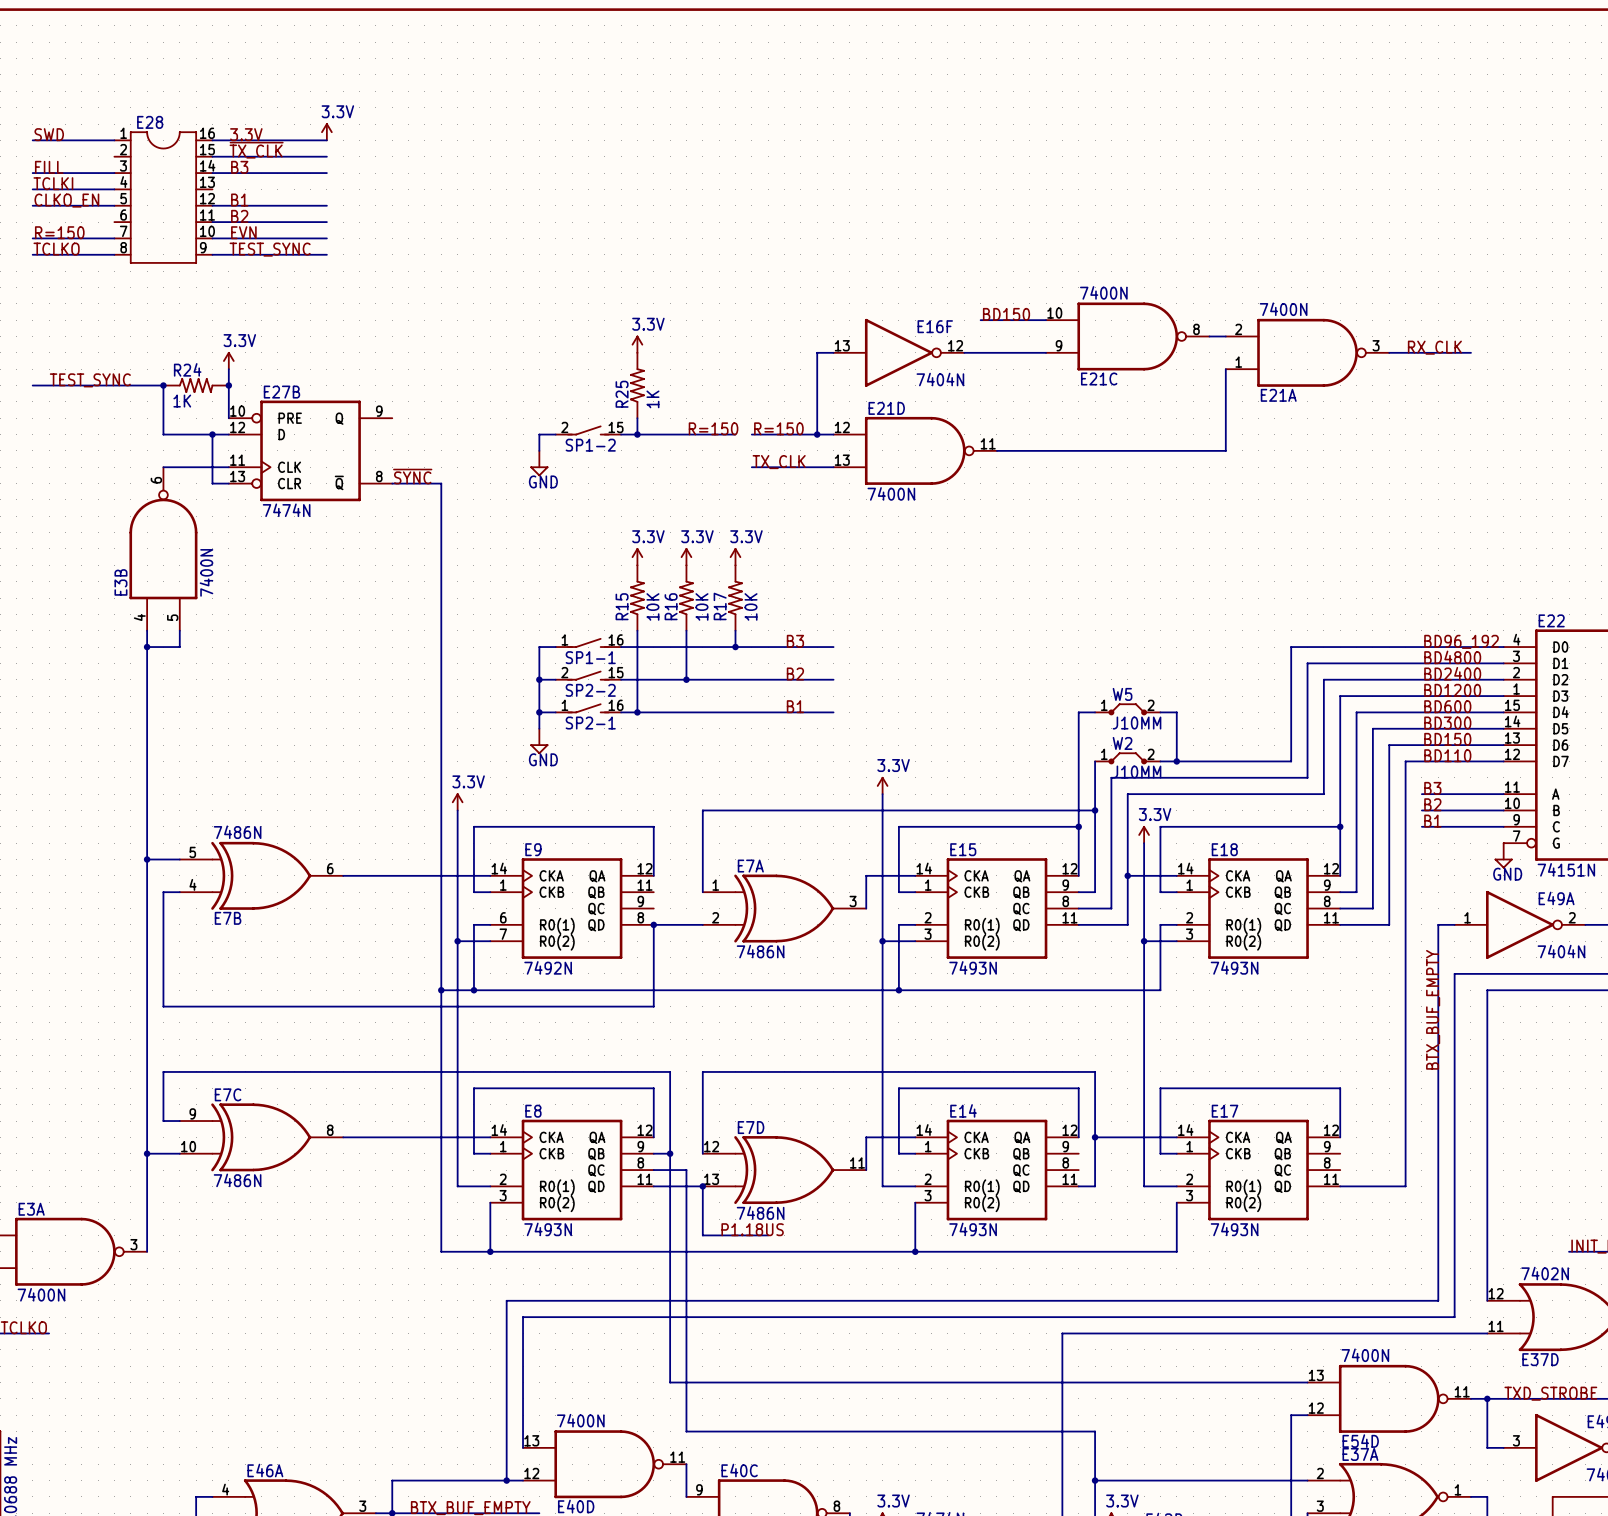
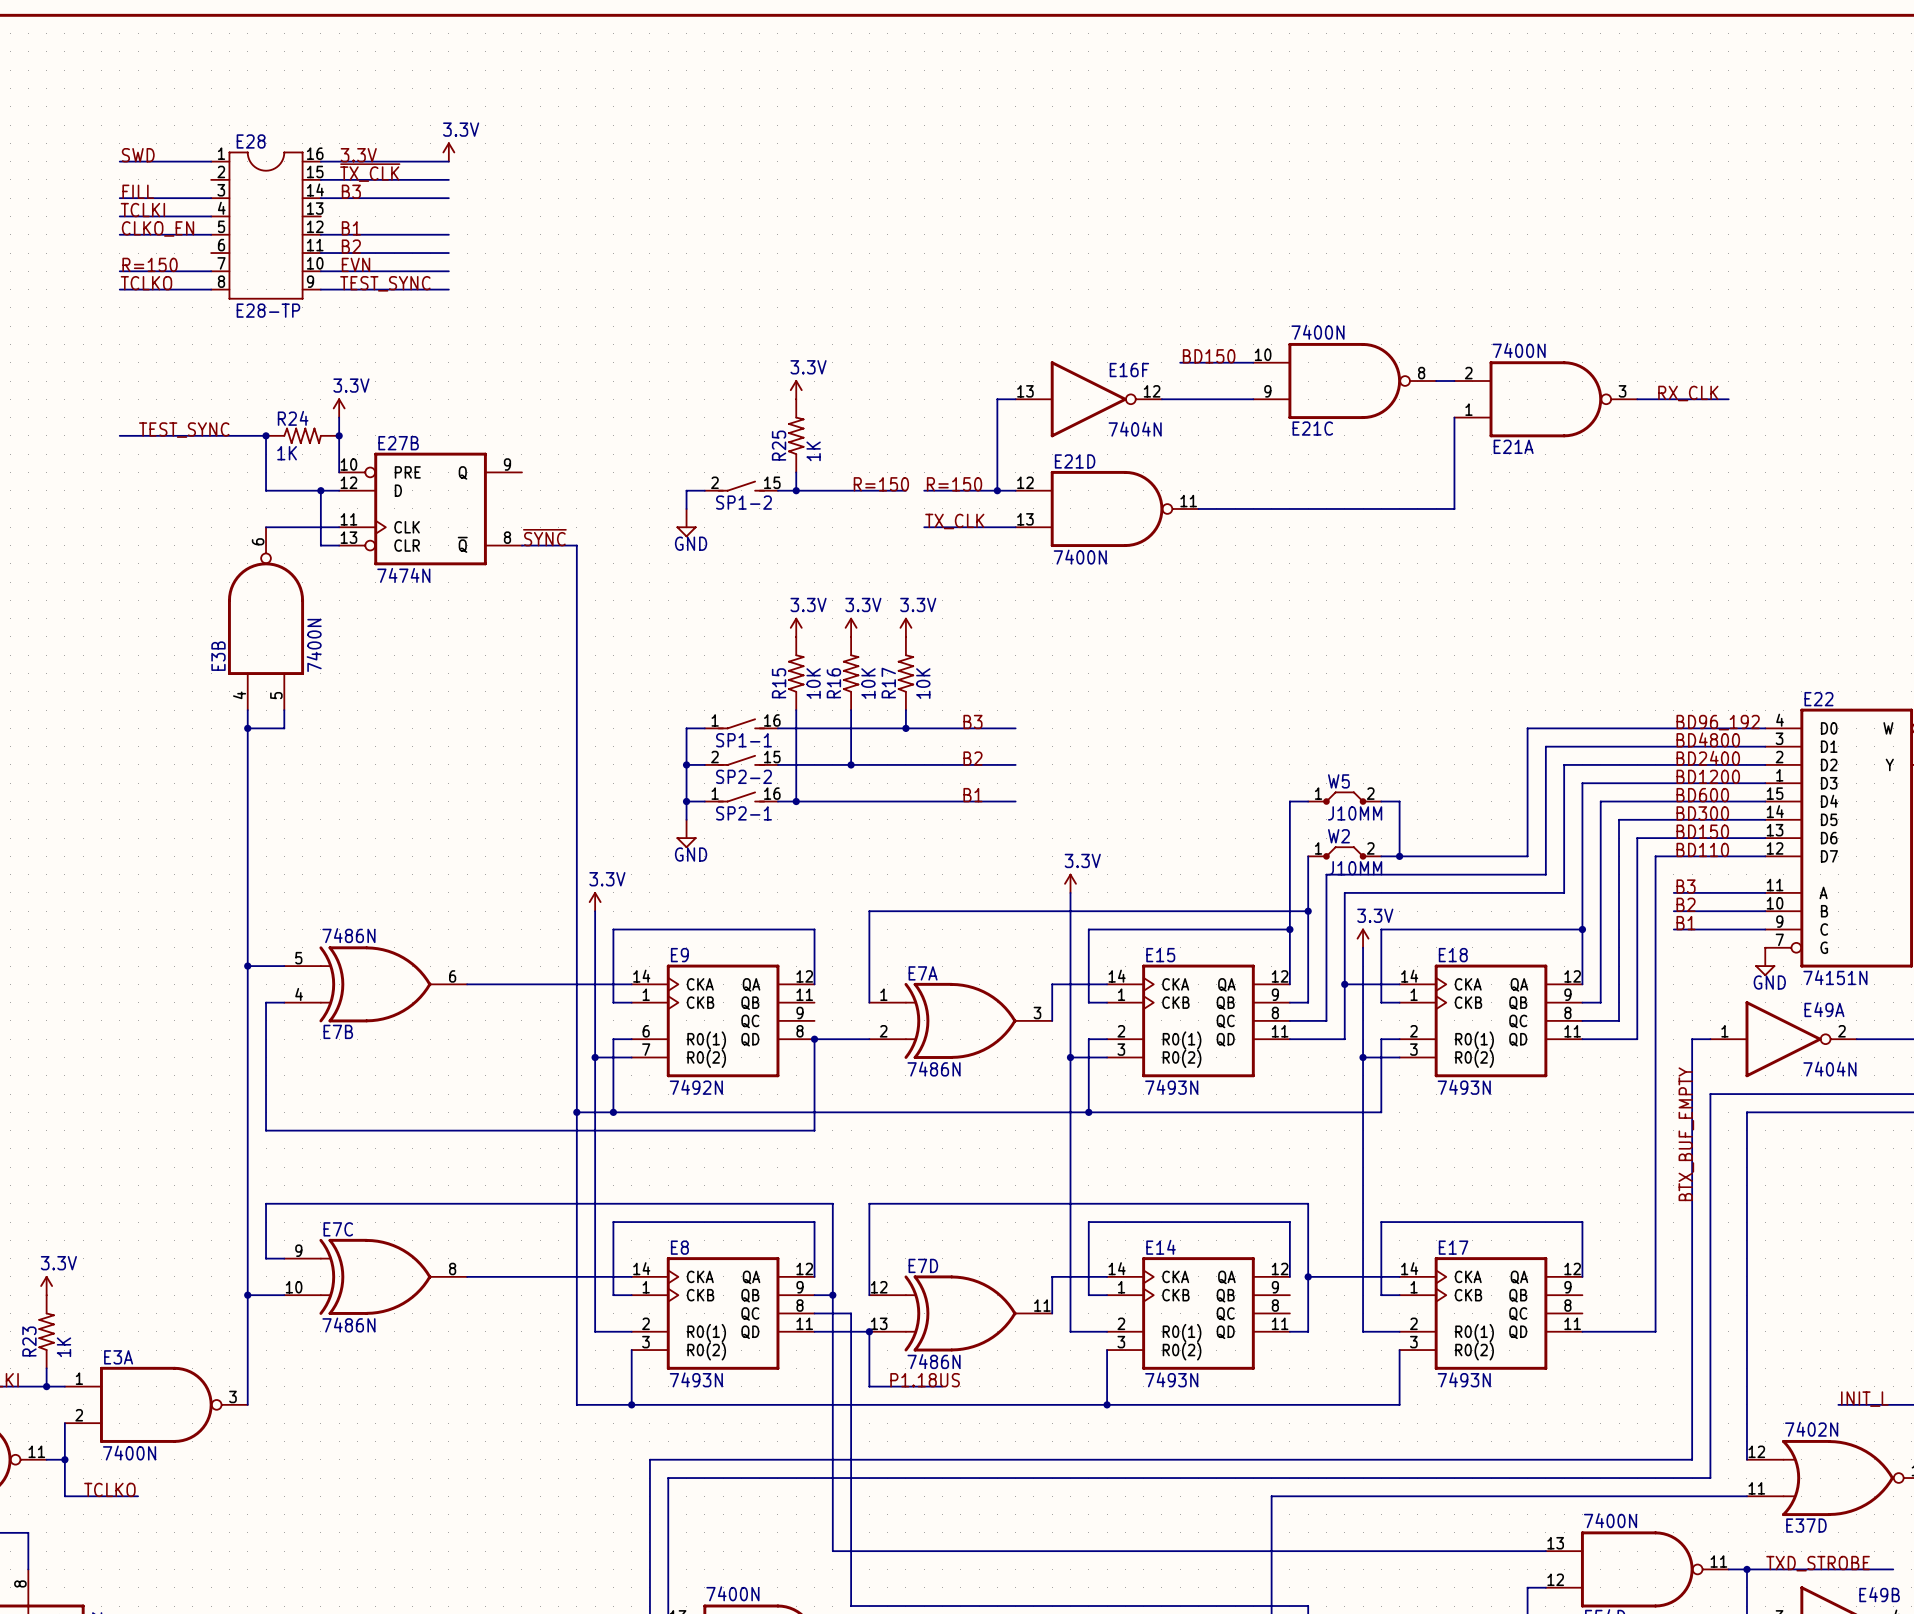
E28 value: none -> E28-TP (268, 310)

